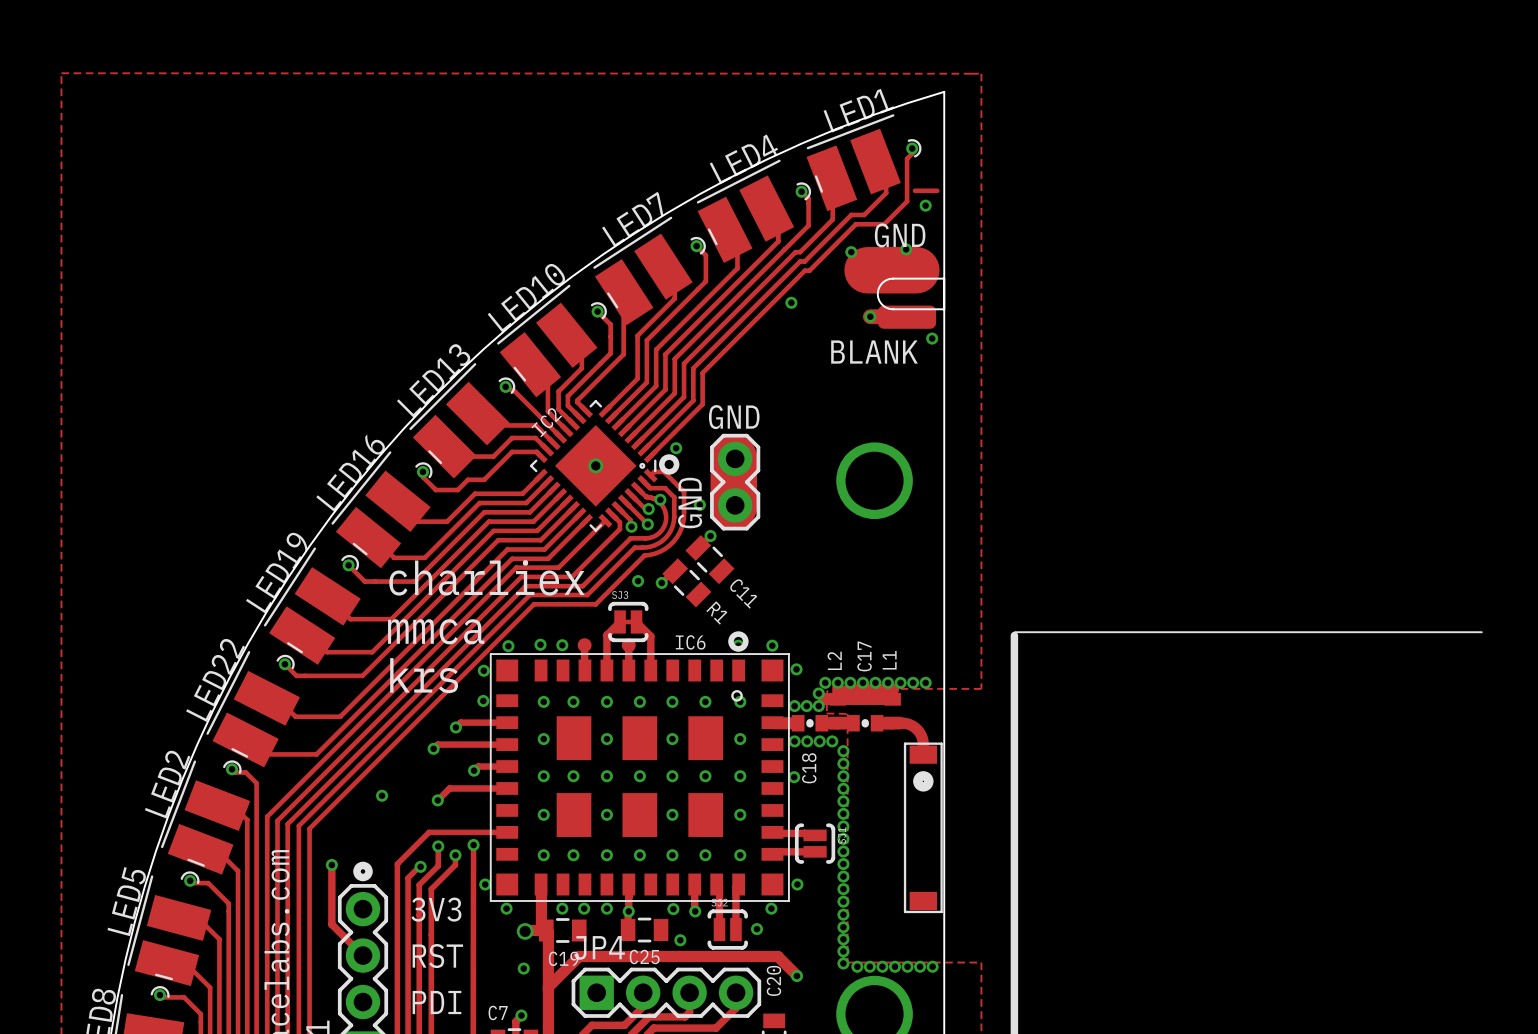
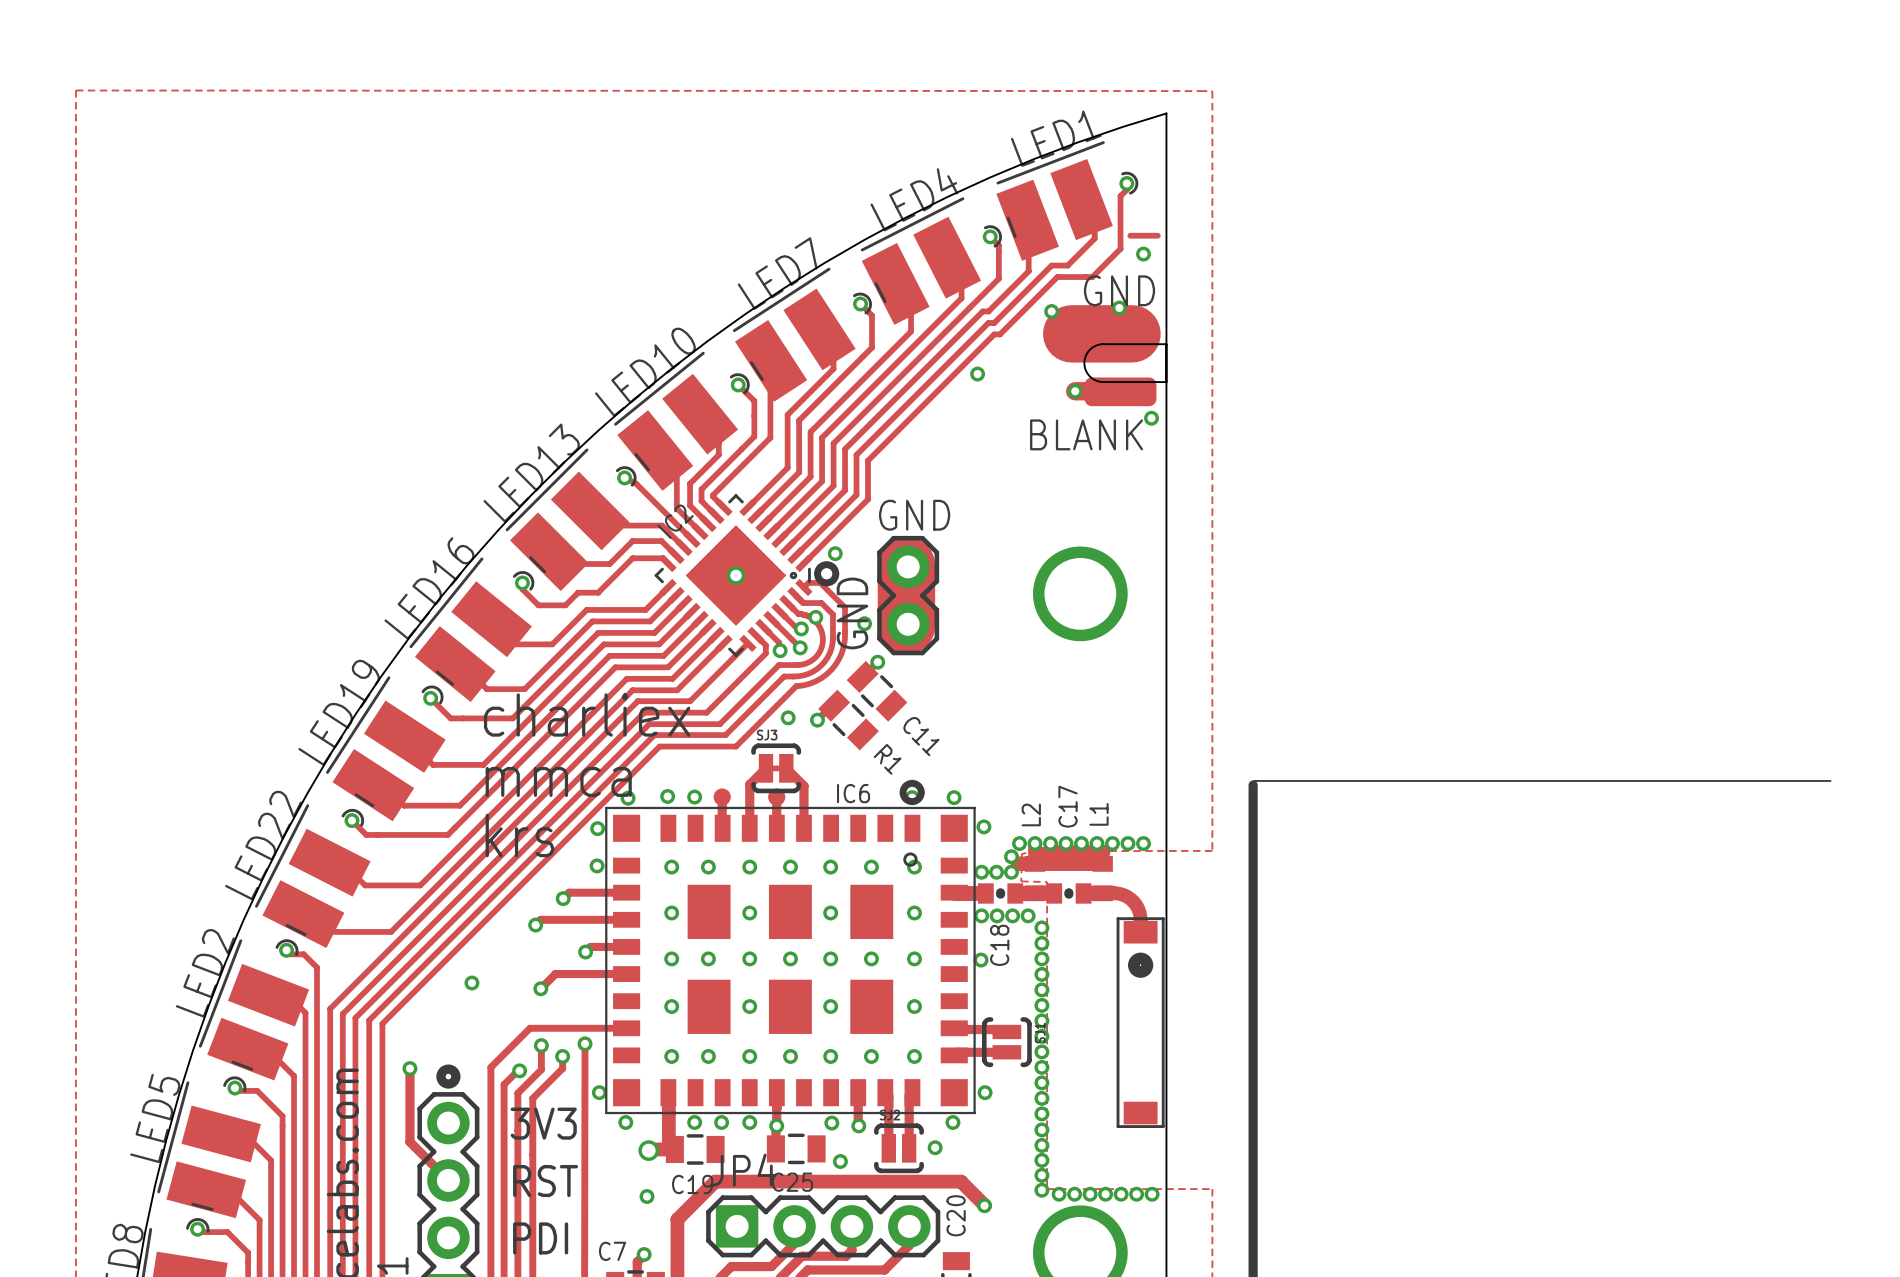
track: (546, 932) (548, 932) (548, 987) -> none

